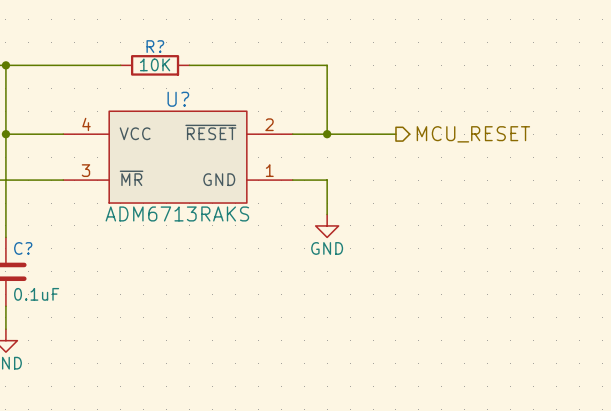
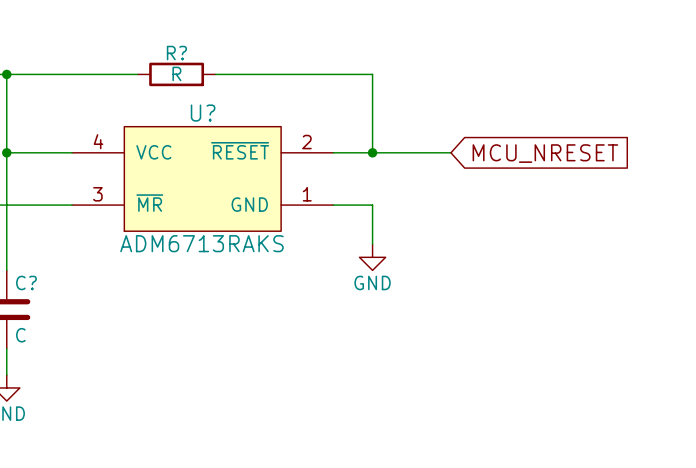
R? value: 10K (155, 64) -> R (176, 73)
hierarchical label: MCU_RESET (473, 134) -> none
global label: none -> MCU_NRESET (545, 153)
C? value: 0.1uF (36, 294) -> C (20, 335)

